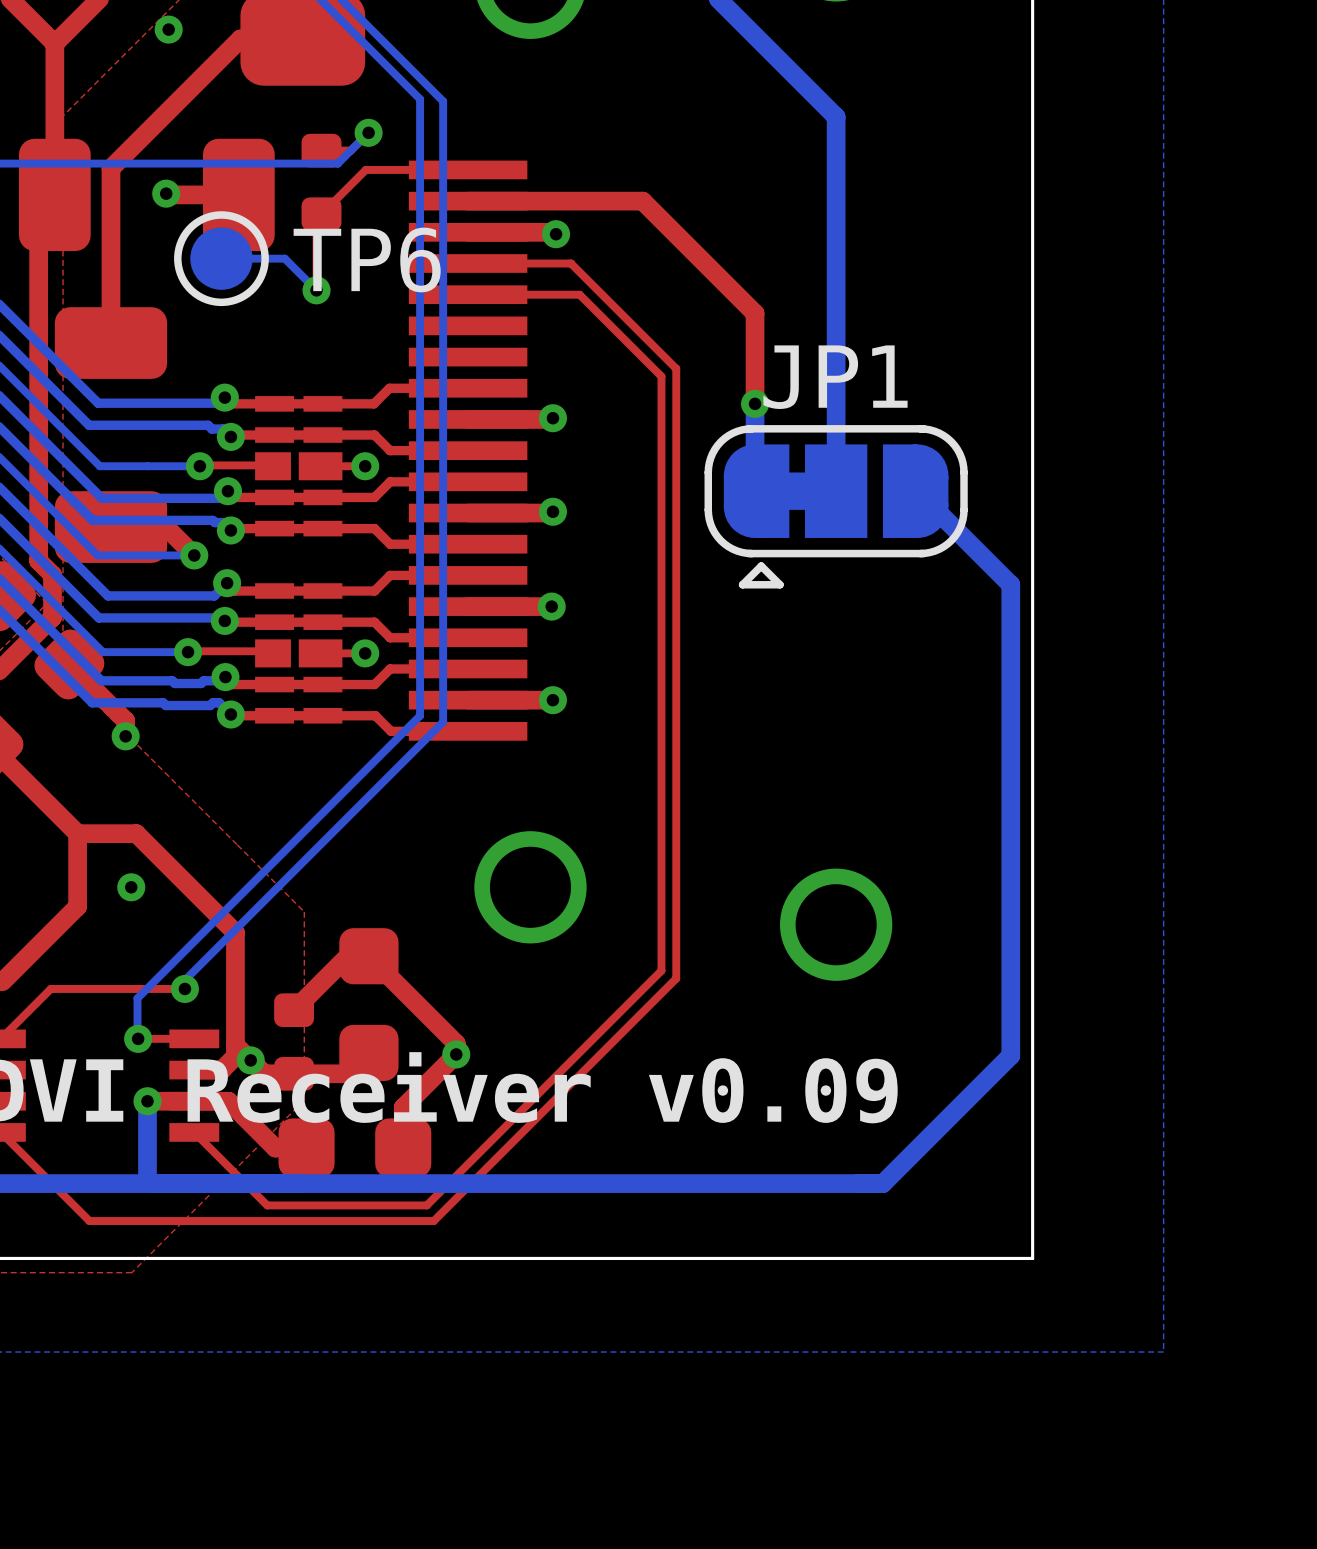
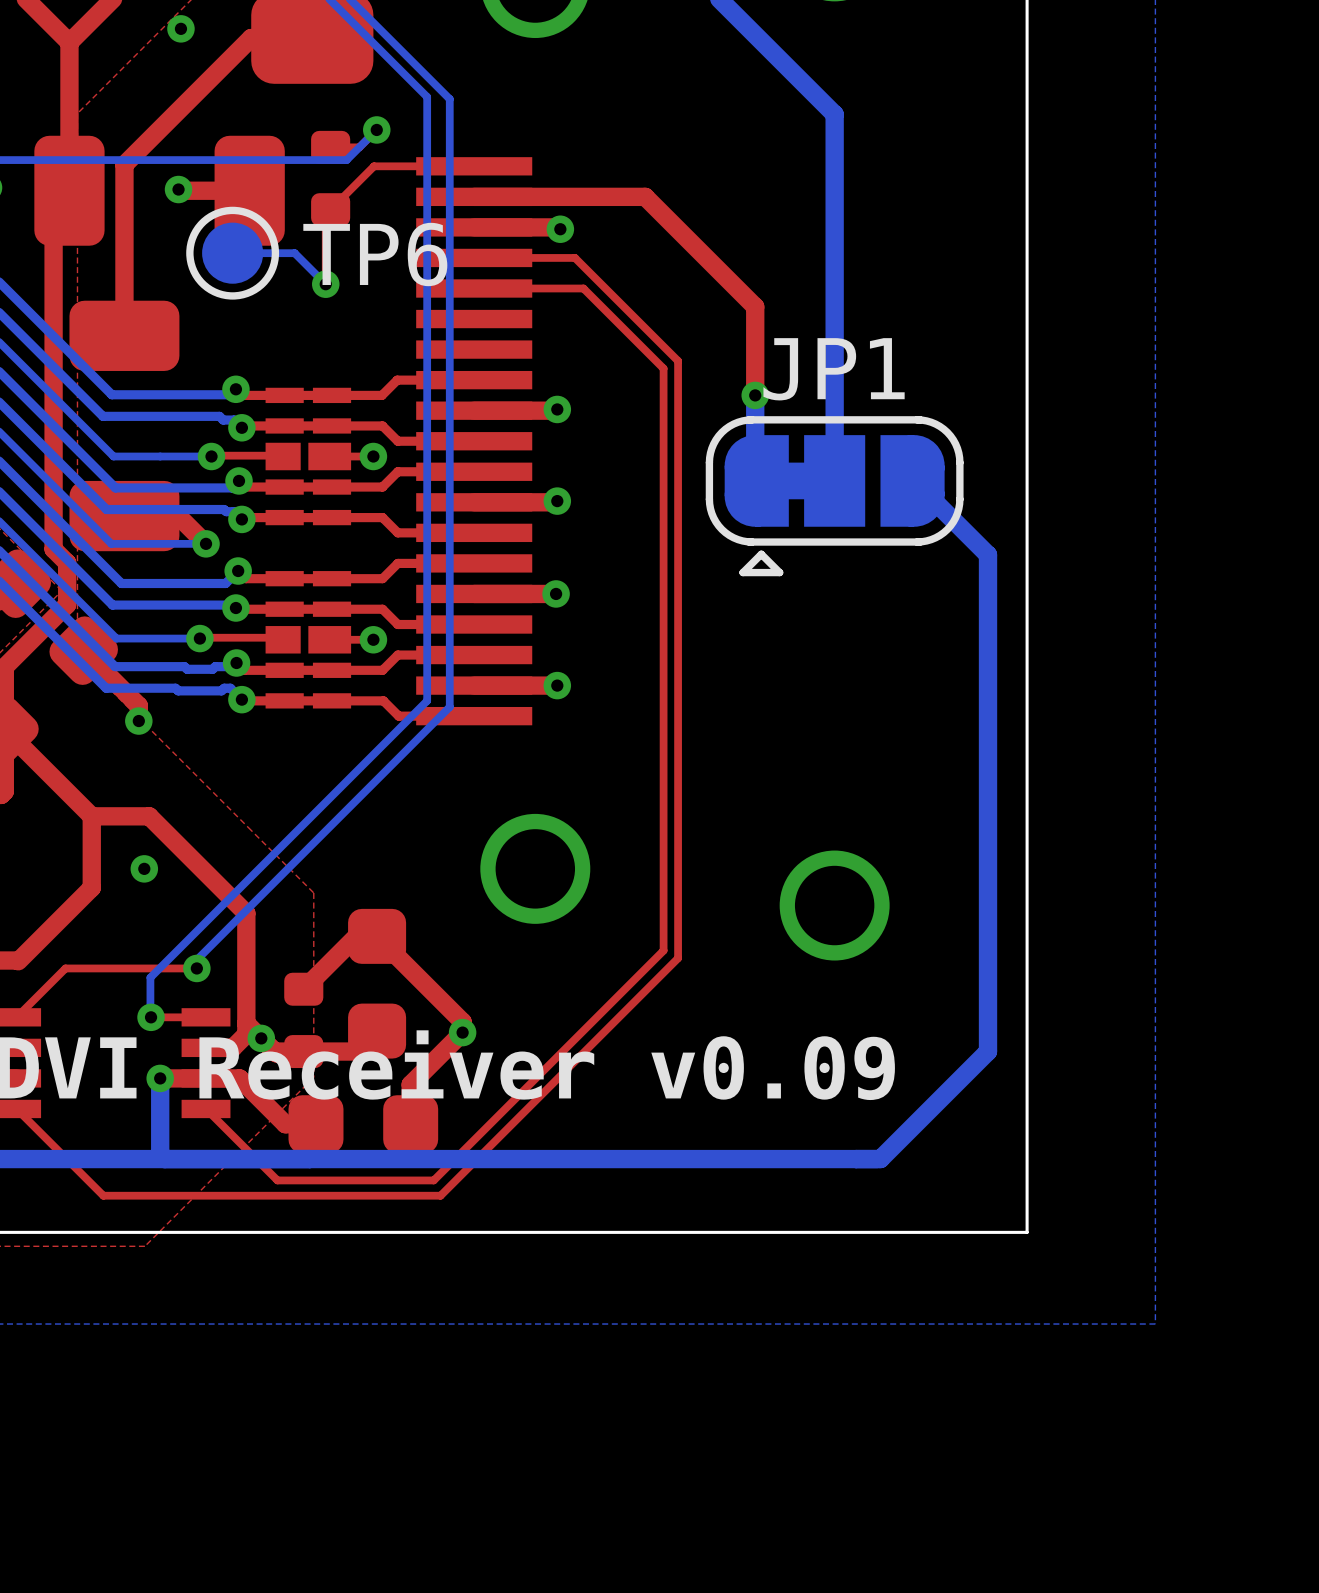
bottom track: (992, 566) (1010, 584) (1010, 1055) (992, 1073) -> (988, 554) (988, 1051)

